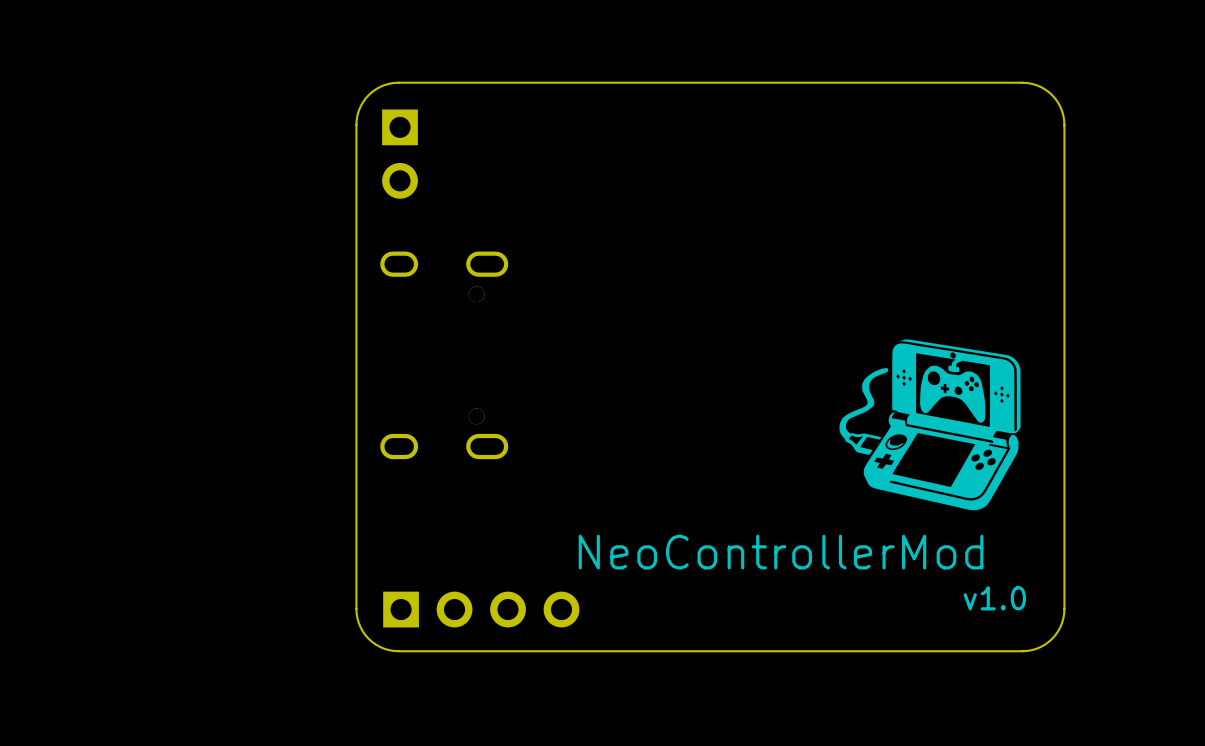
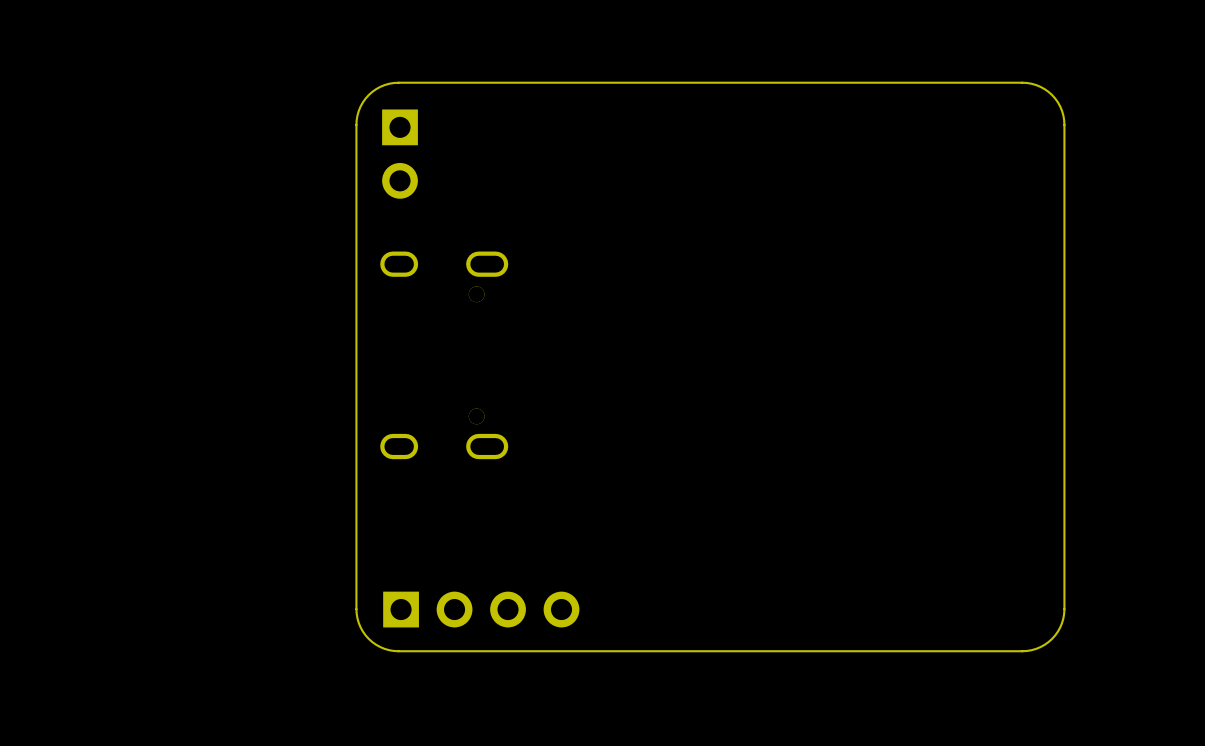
drawing: [839, 339, 1021, 511] -> none
text: NeoControllerMod (781, 552) -> none
text: v1.0 (994, 598) -> none

